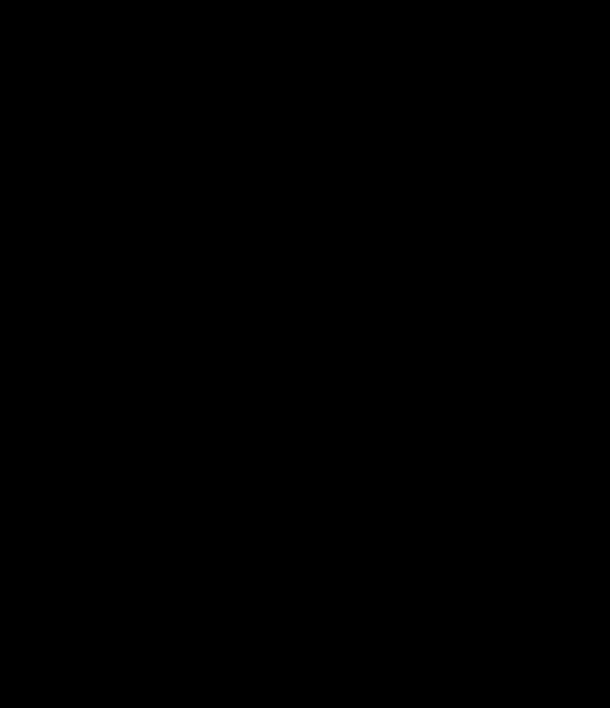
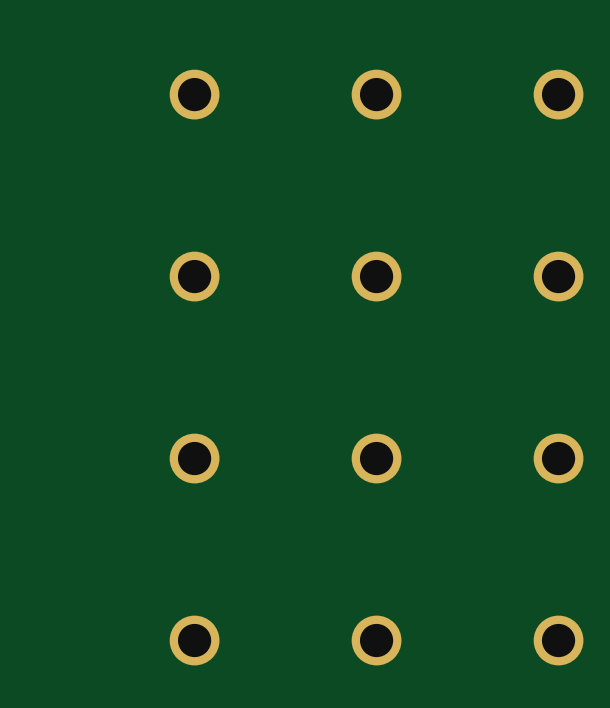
part: none -> (194, 94)
part: none -> (376, 94)
part: none -> (558, 94)
part: none -> (194, 276)
part: none -> (376, 276)
part: none -> (558, 276)
part: none -> (194, 458)
part: none -> (376, 458)
part: none -> (558, 458)
part: none -> (194, 640)
part: none -> (376, 640)
part: none -> (558, 640)

